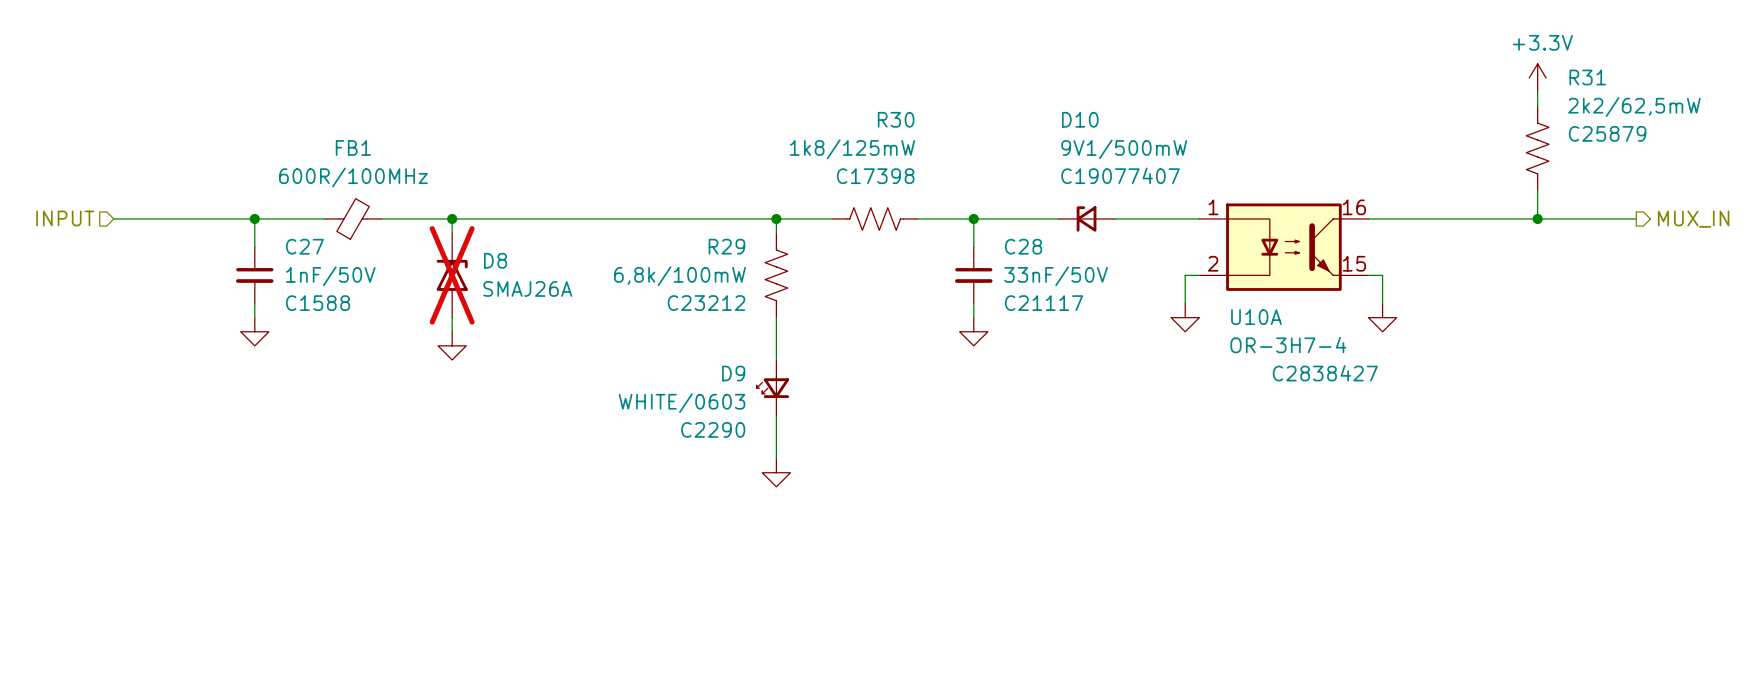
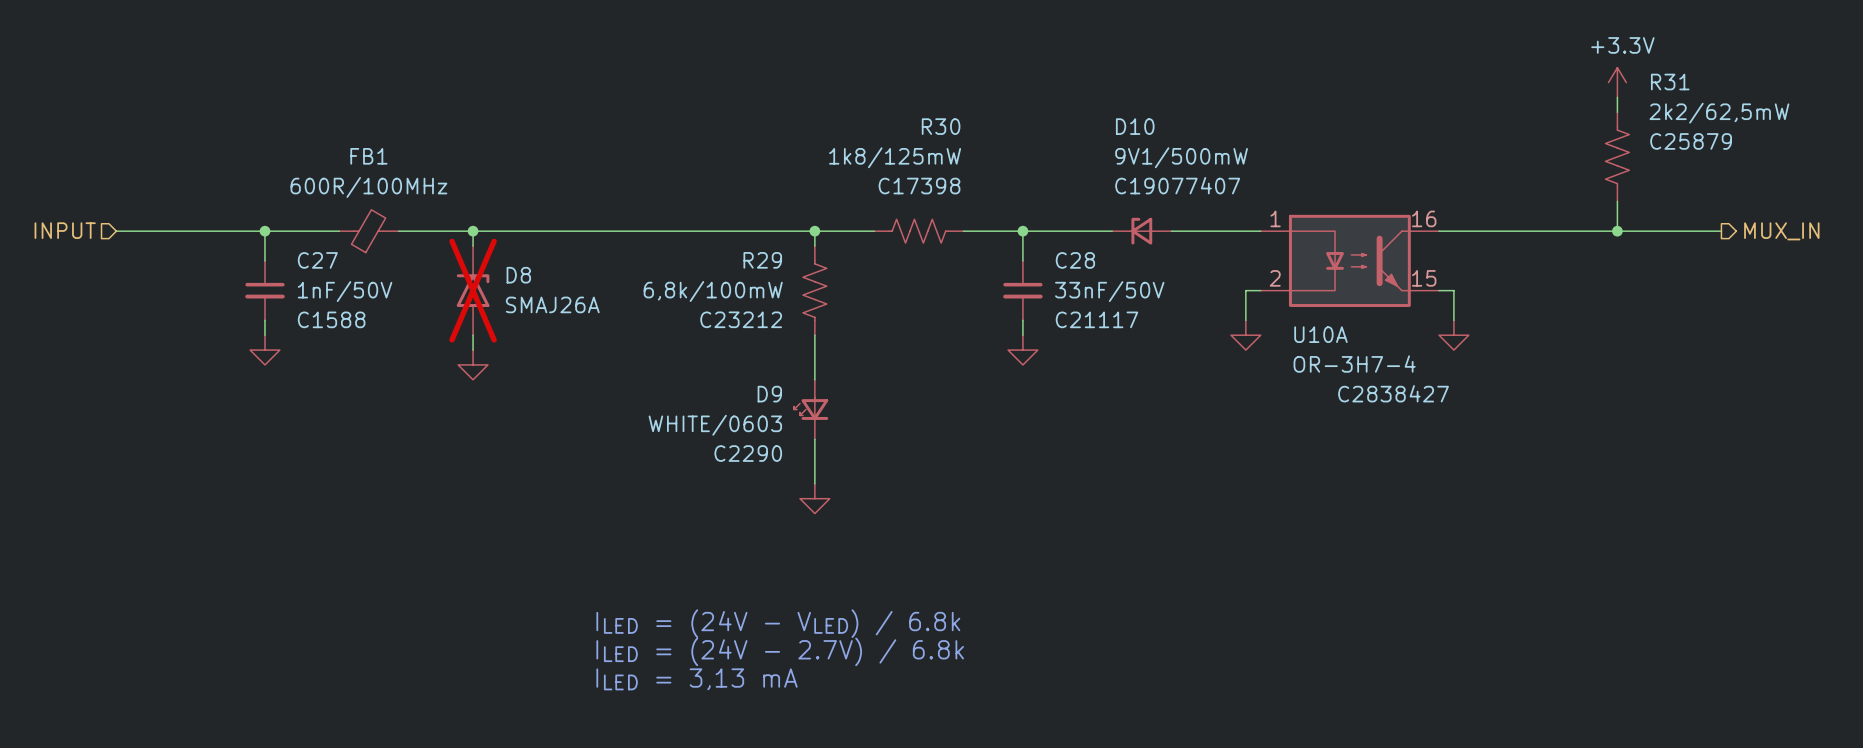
text: none -> ILED = (24V - VLED) / 6.8k (778, 623)
text: none -> ILED = (24V - 2.7V) / 6.8k (780, 651)
text: none -> ILED = 3,13 mA (697, 679)

